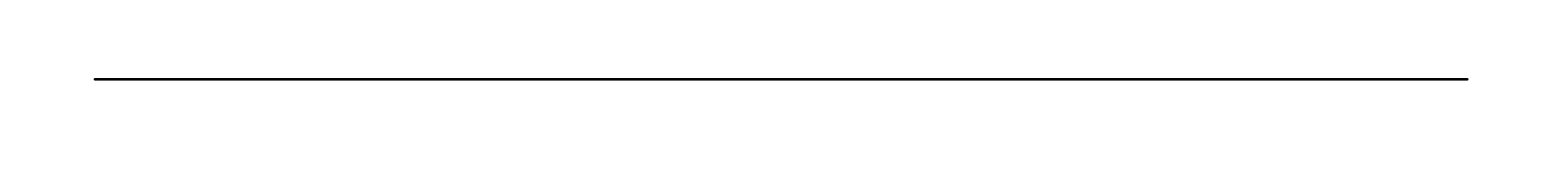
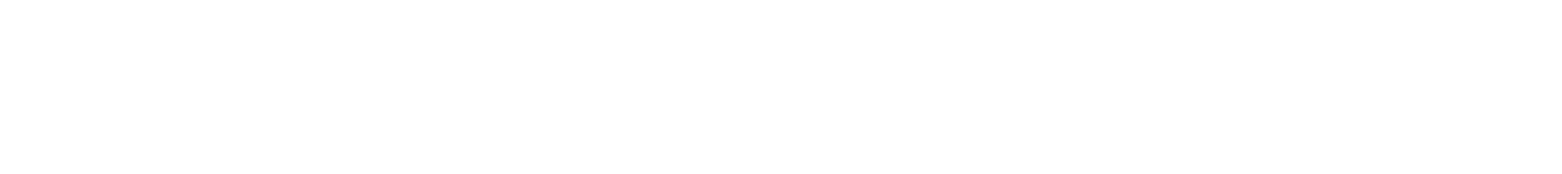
line: (1467, 79) (94, 79) -> none

